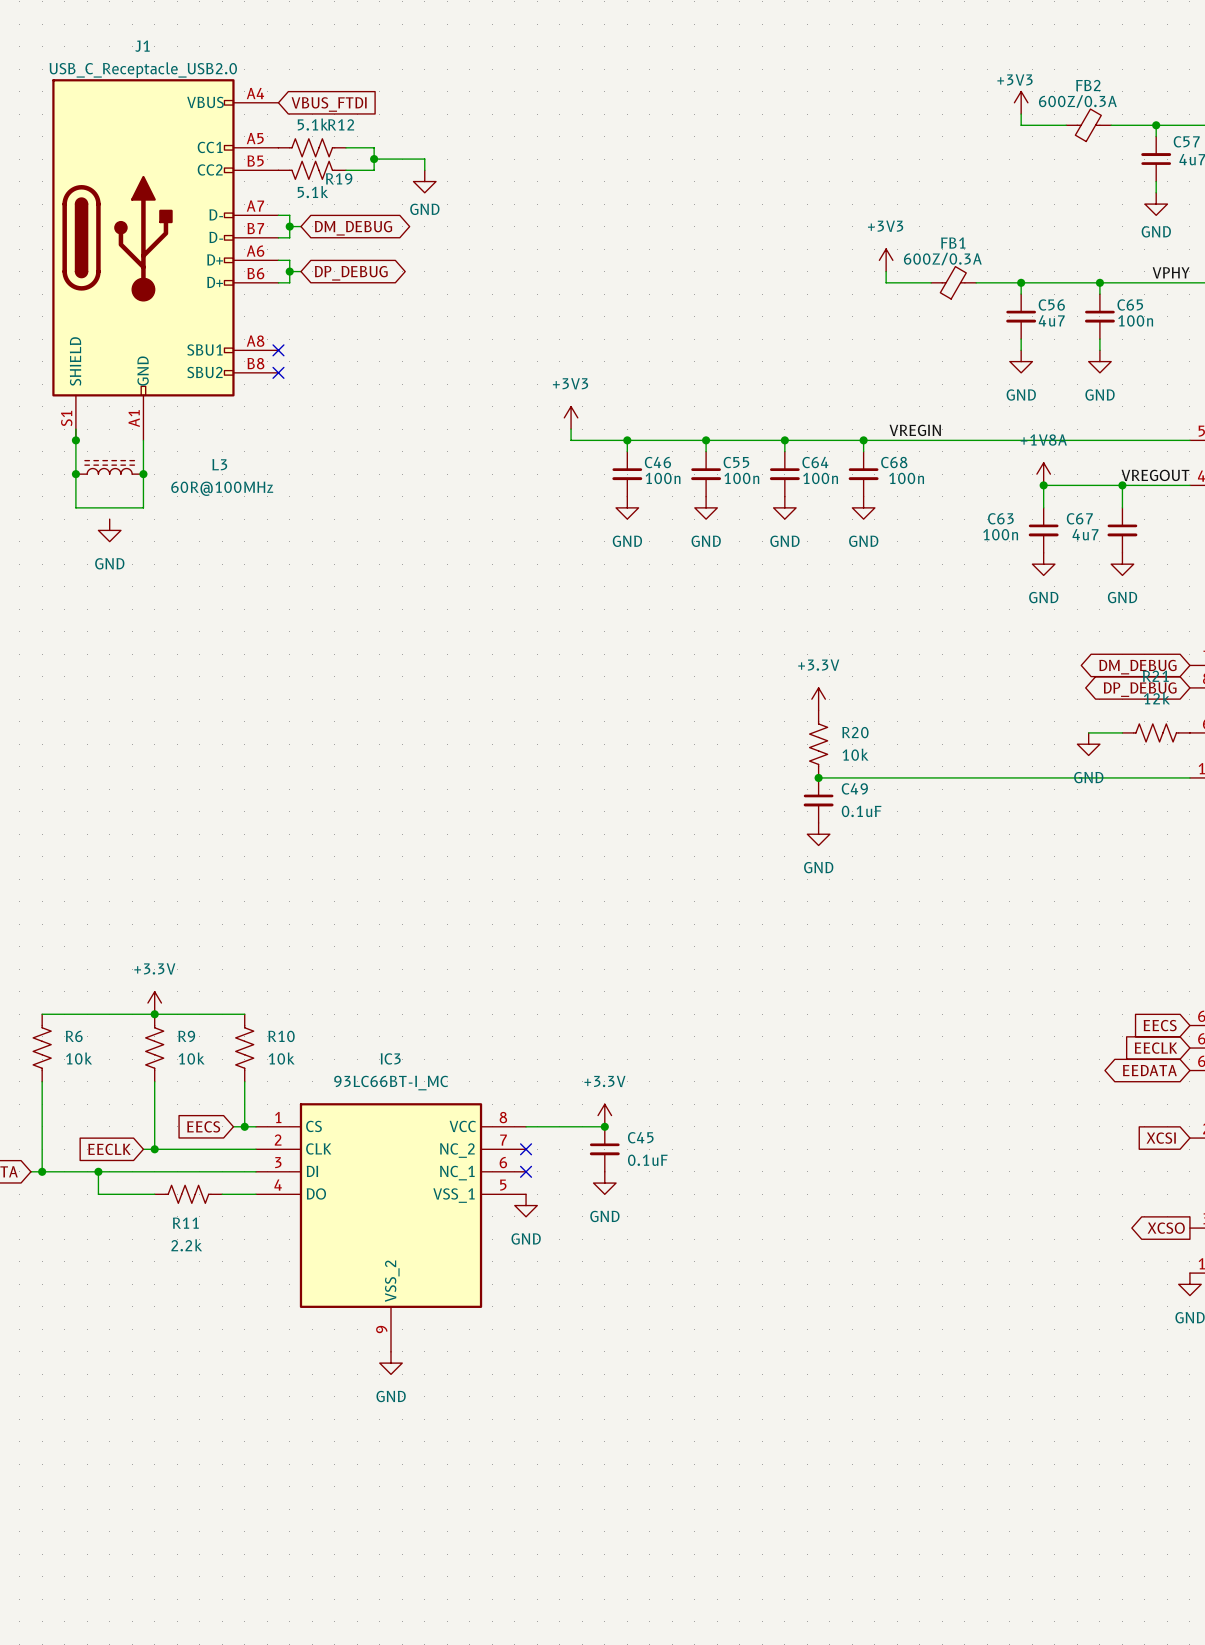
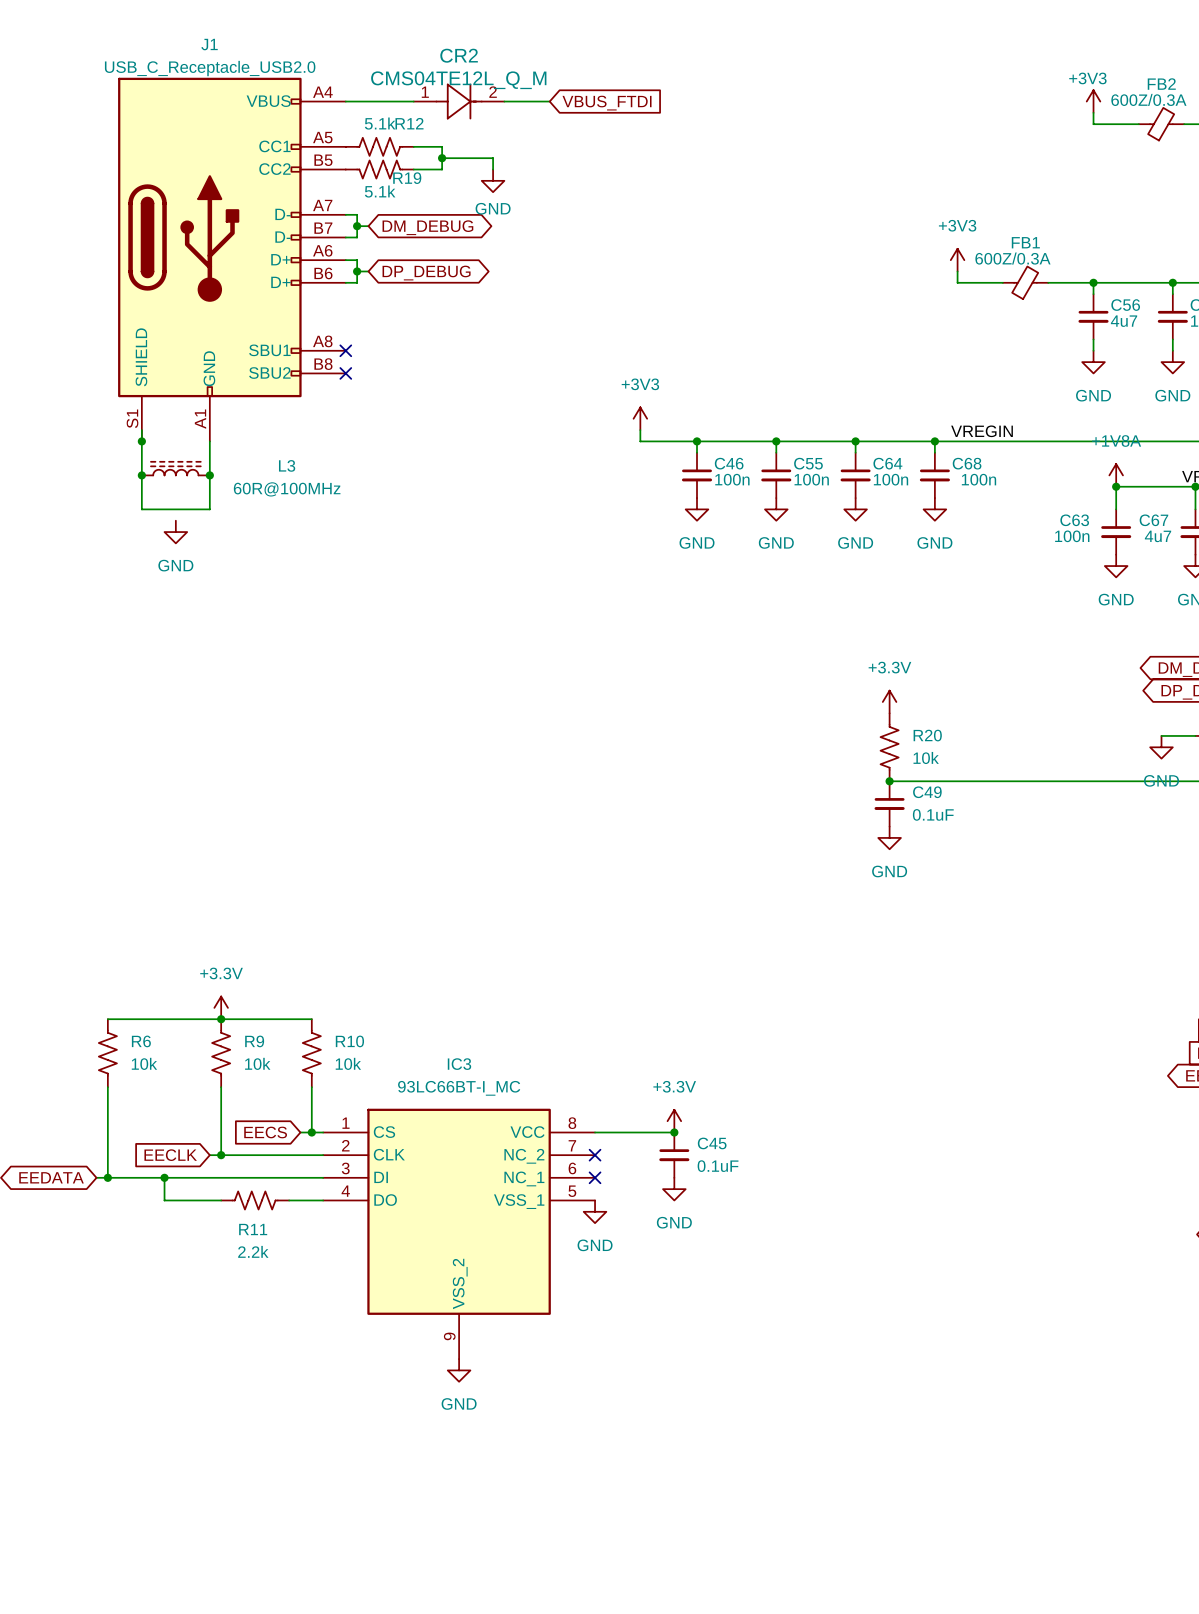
wire: none -> (345, 101) (413, 101)
CR2: none -> CMS04TE12L_Q_M (459, 101)
wire: none -> (504, 101) (549, 101)
global label position: VBUS_FTDI (329, 104) -> VBUS_FTDI (607, 103)

